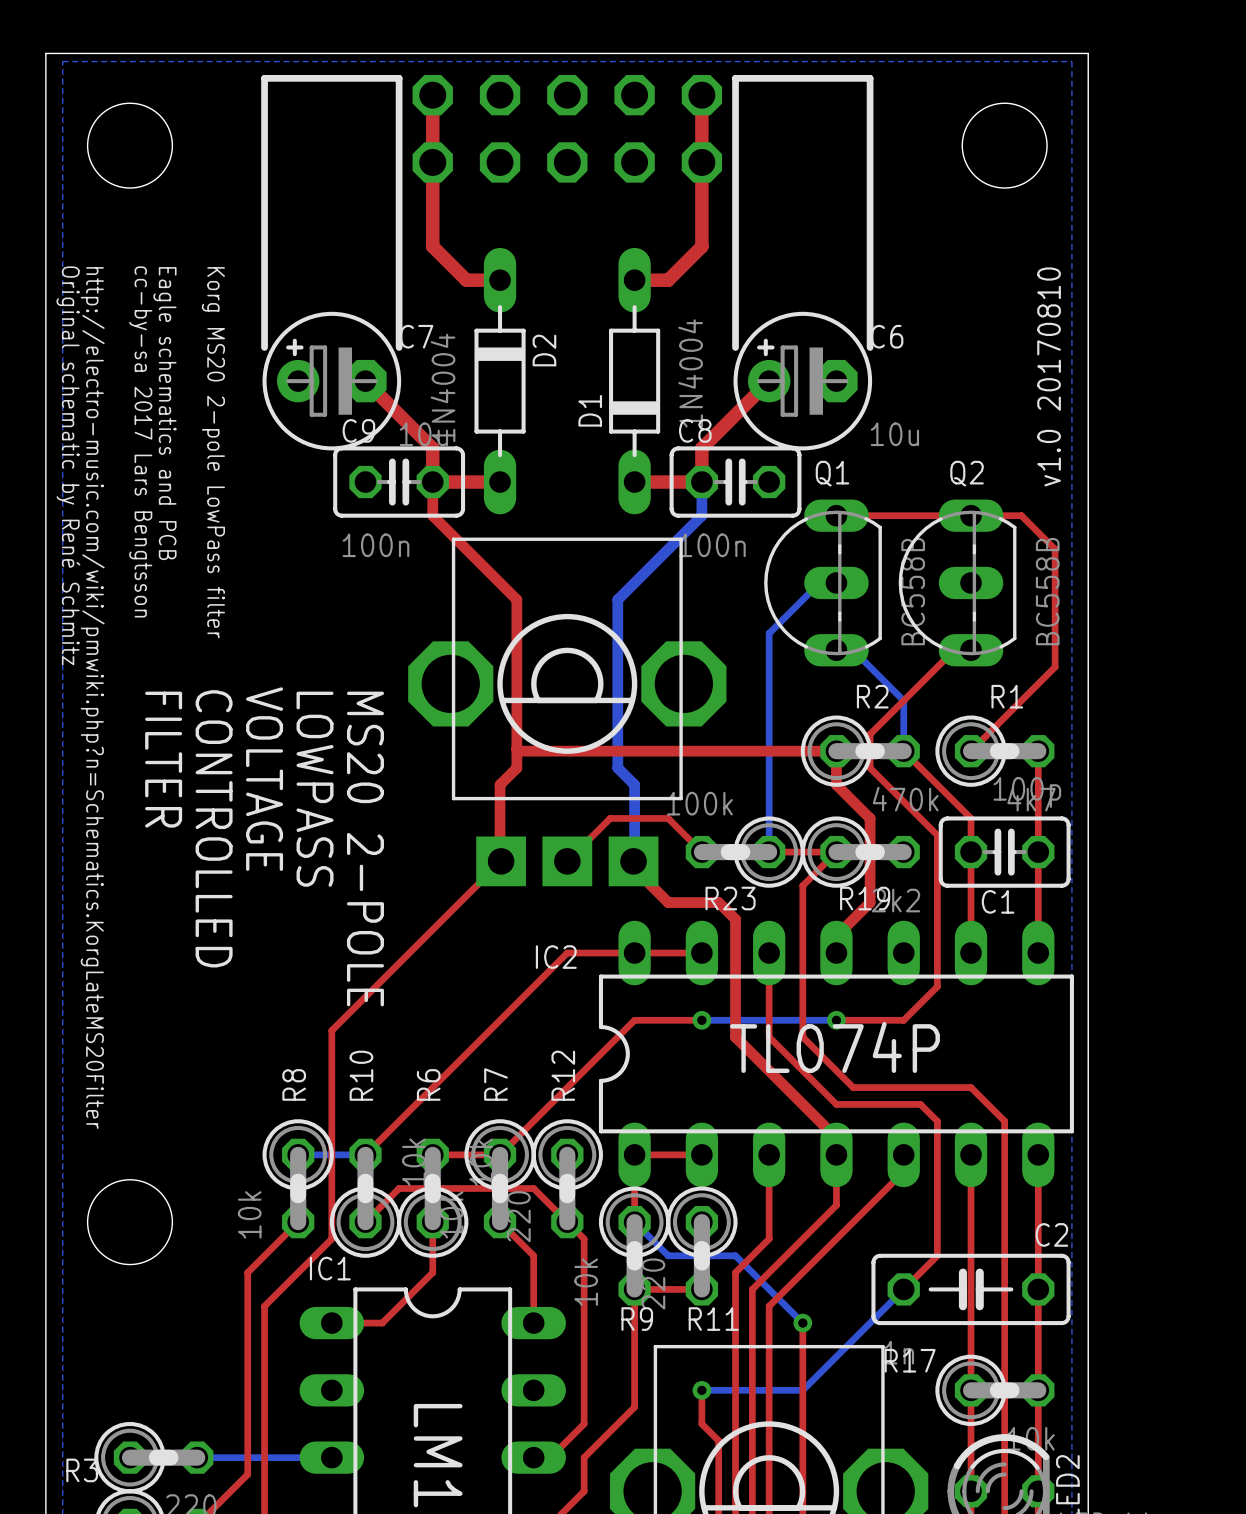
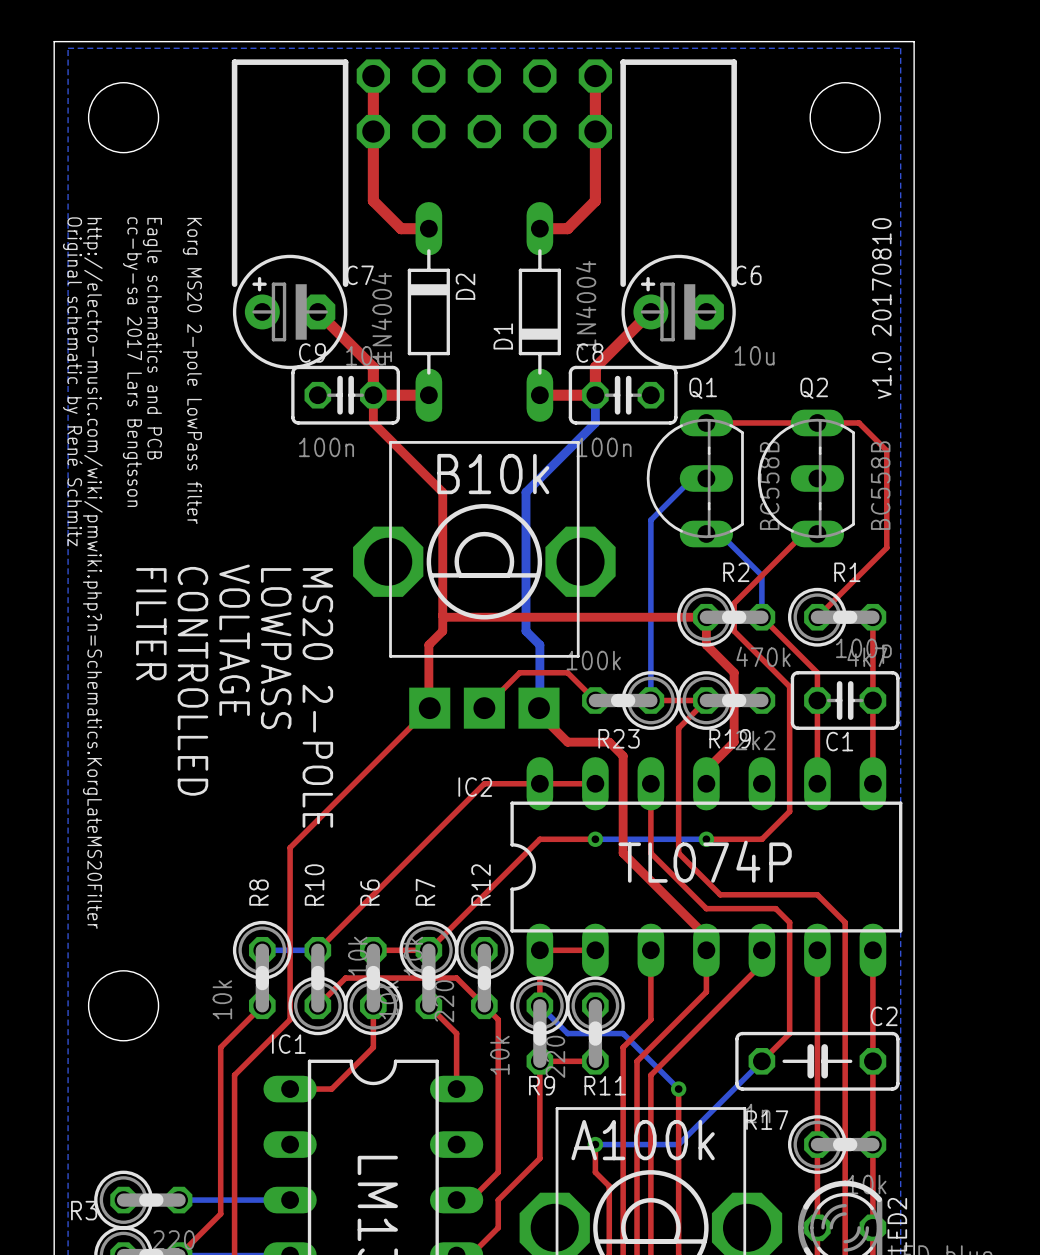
text: none -> B10k (493, 474)
text: none -> A100k (643, 1140)

